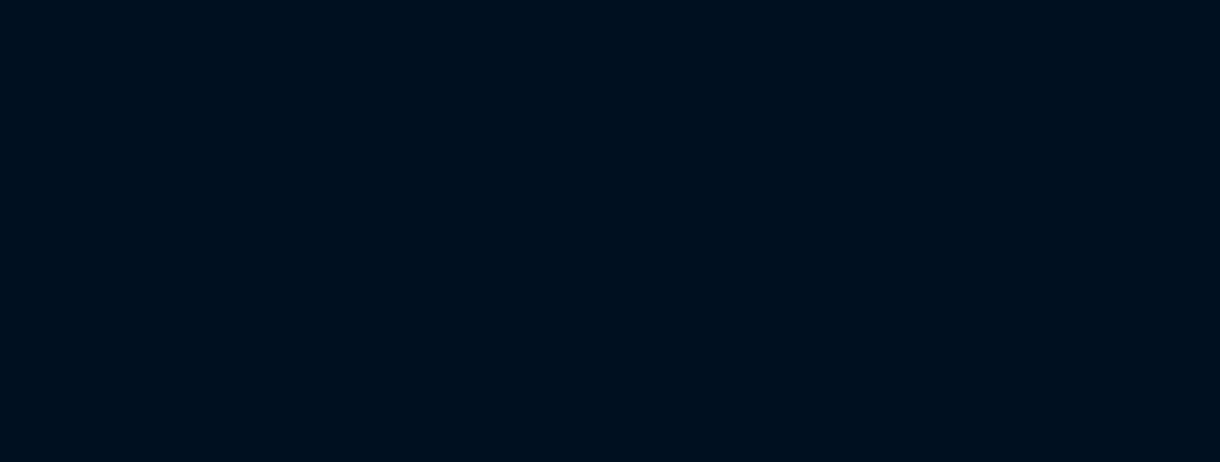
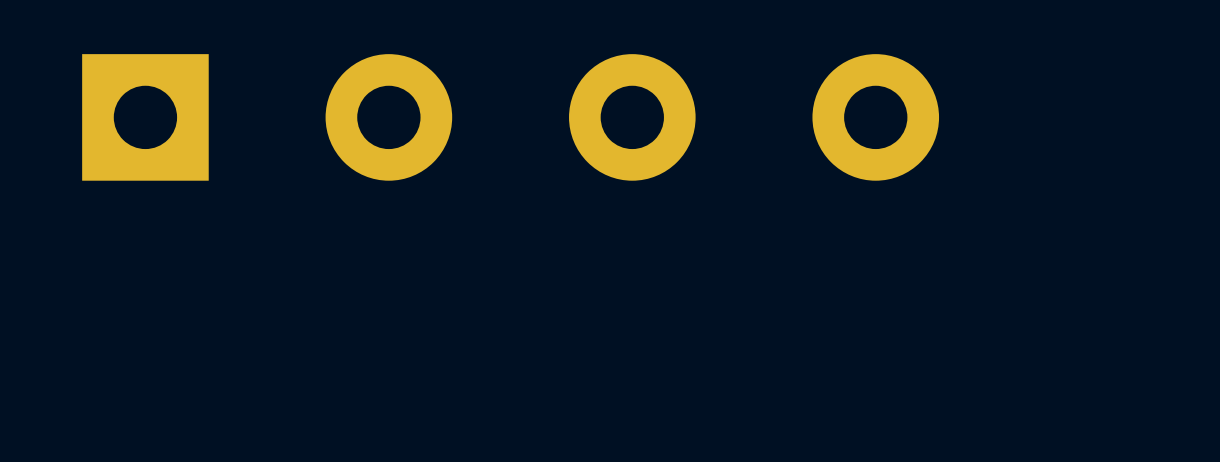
part: none -> (510, 117)

